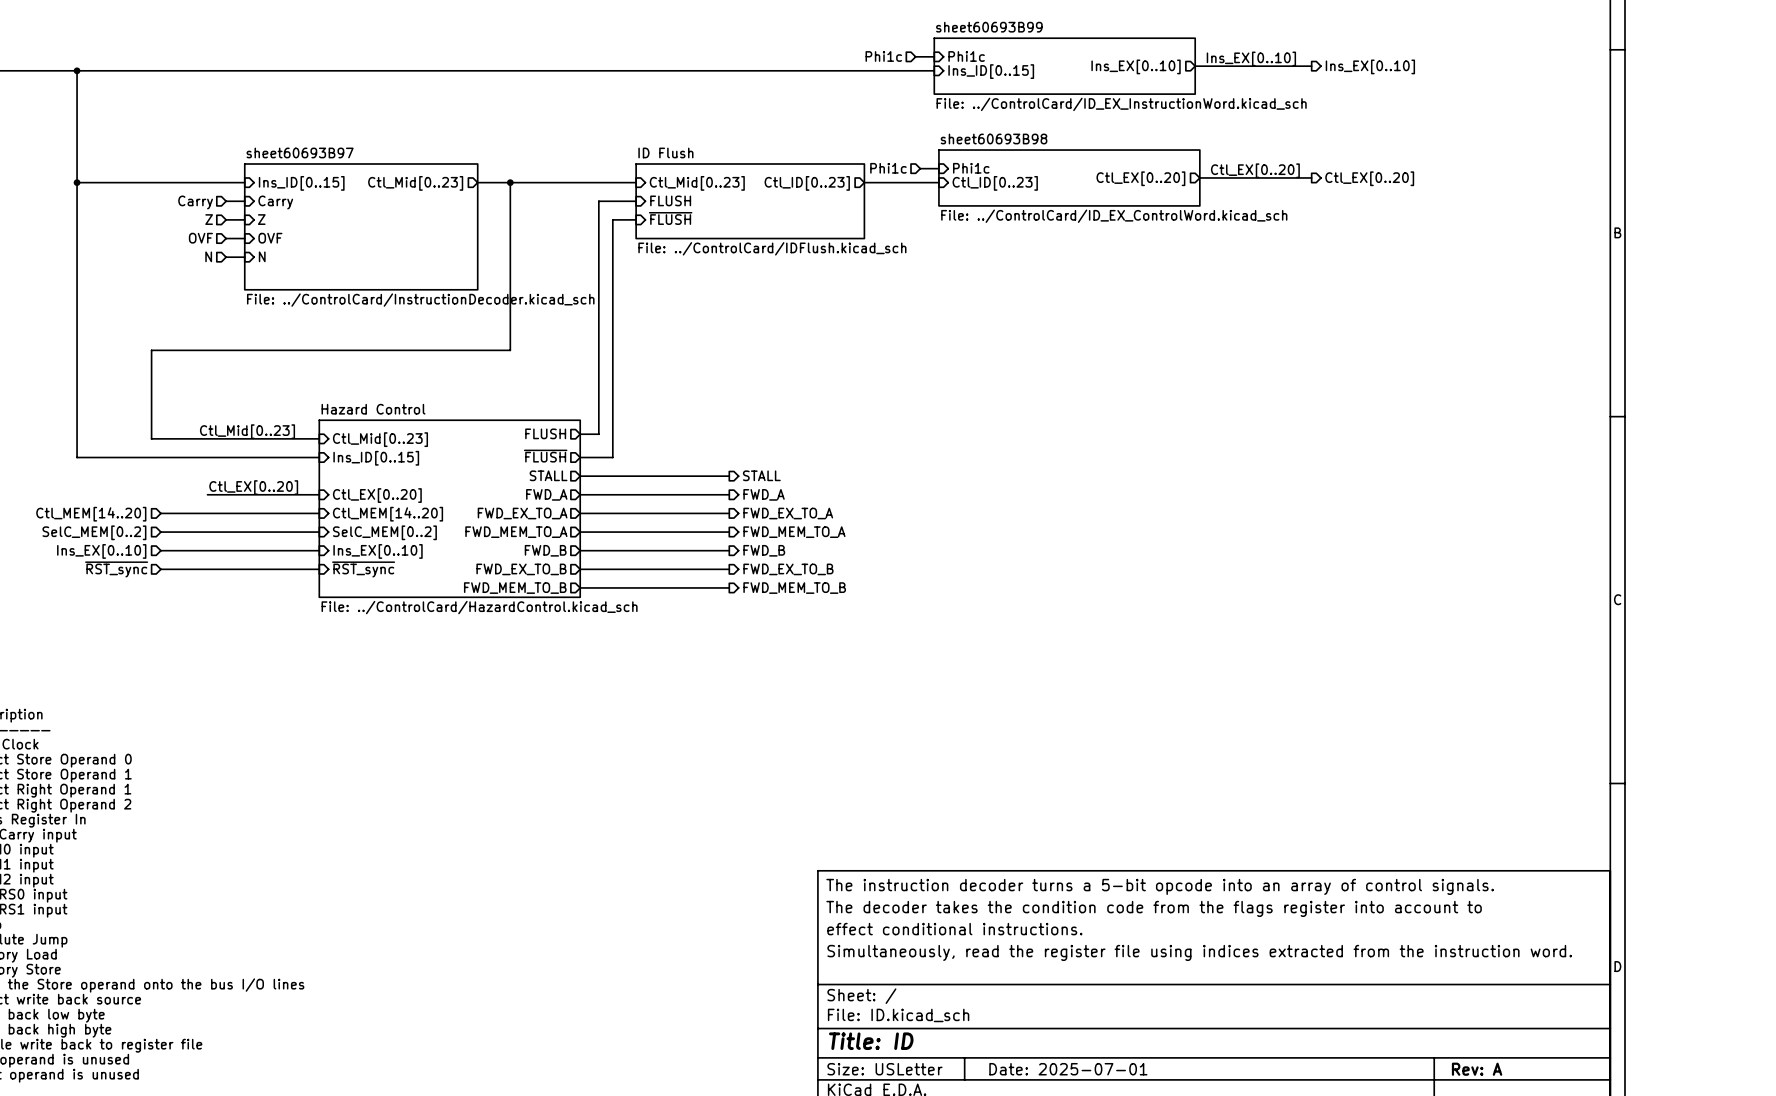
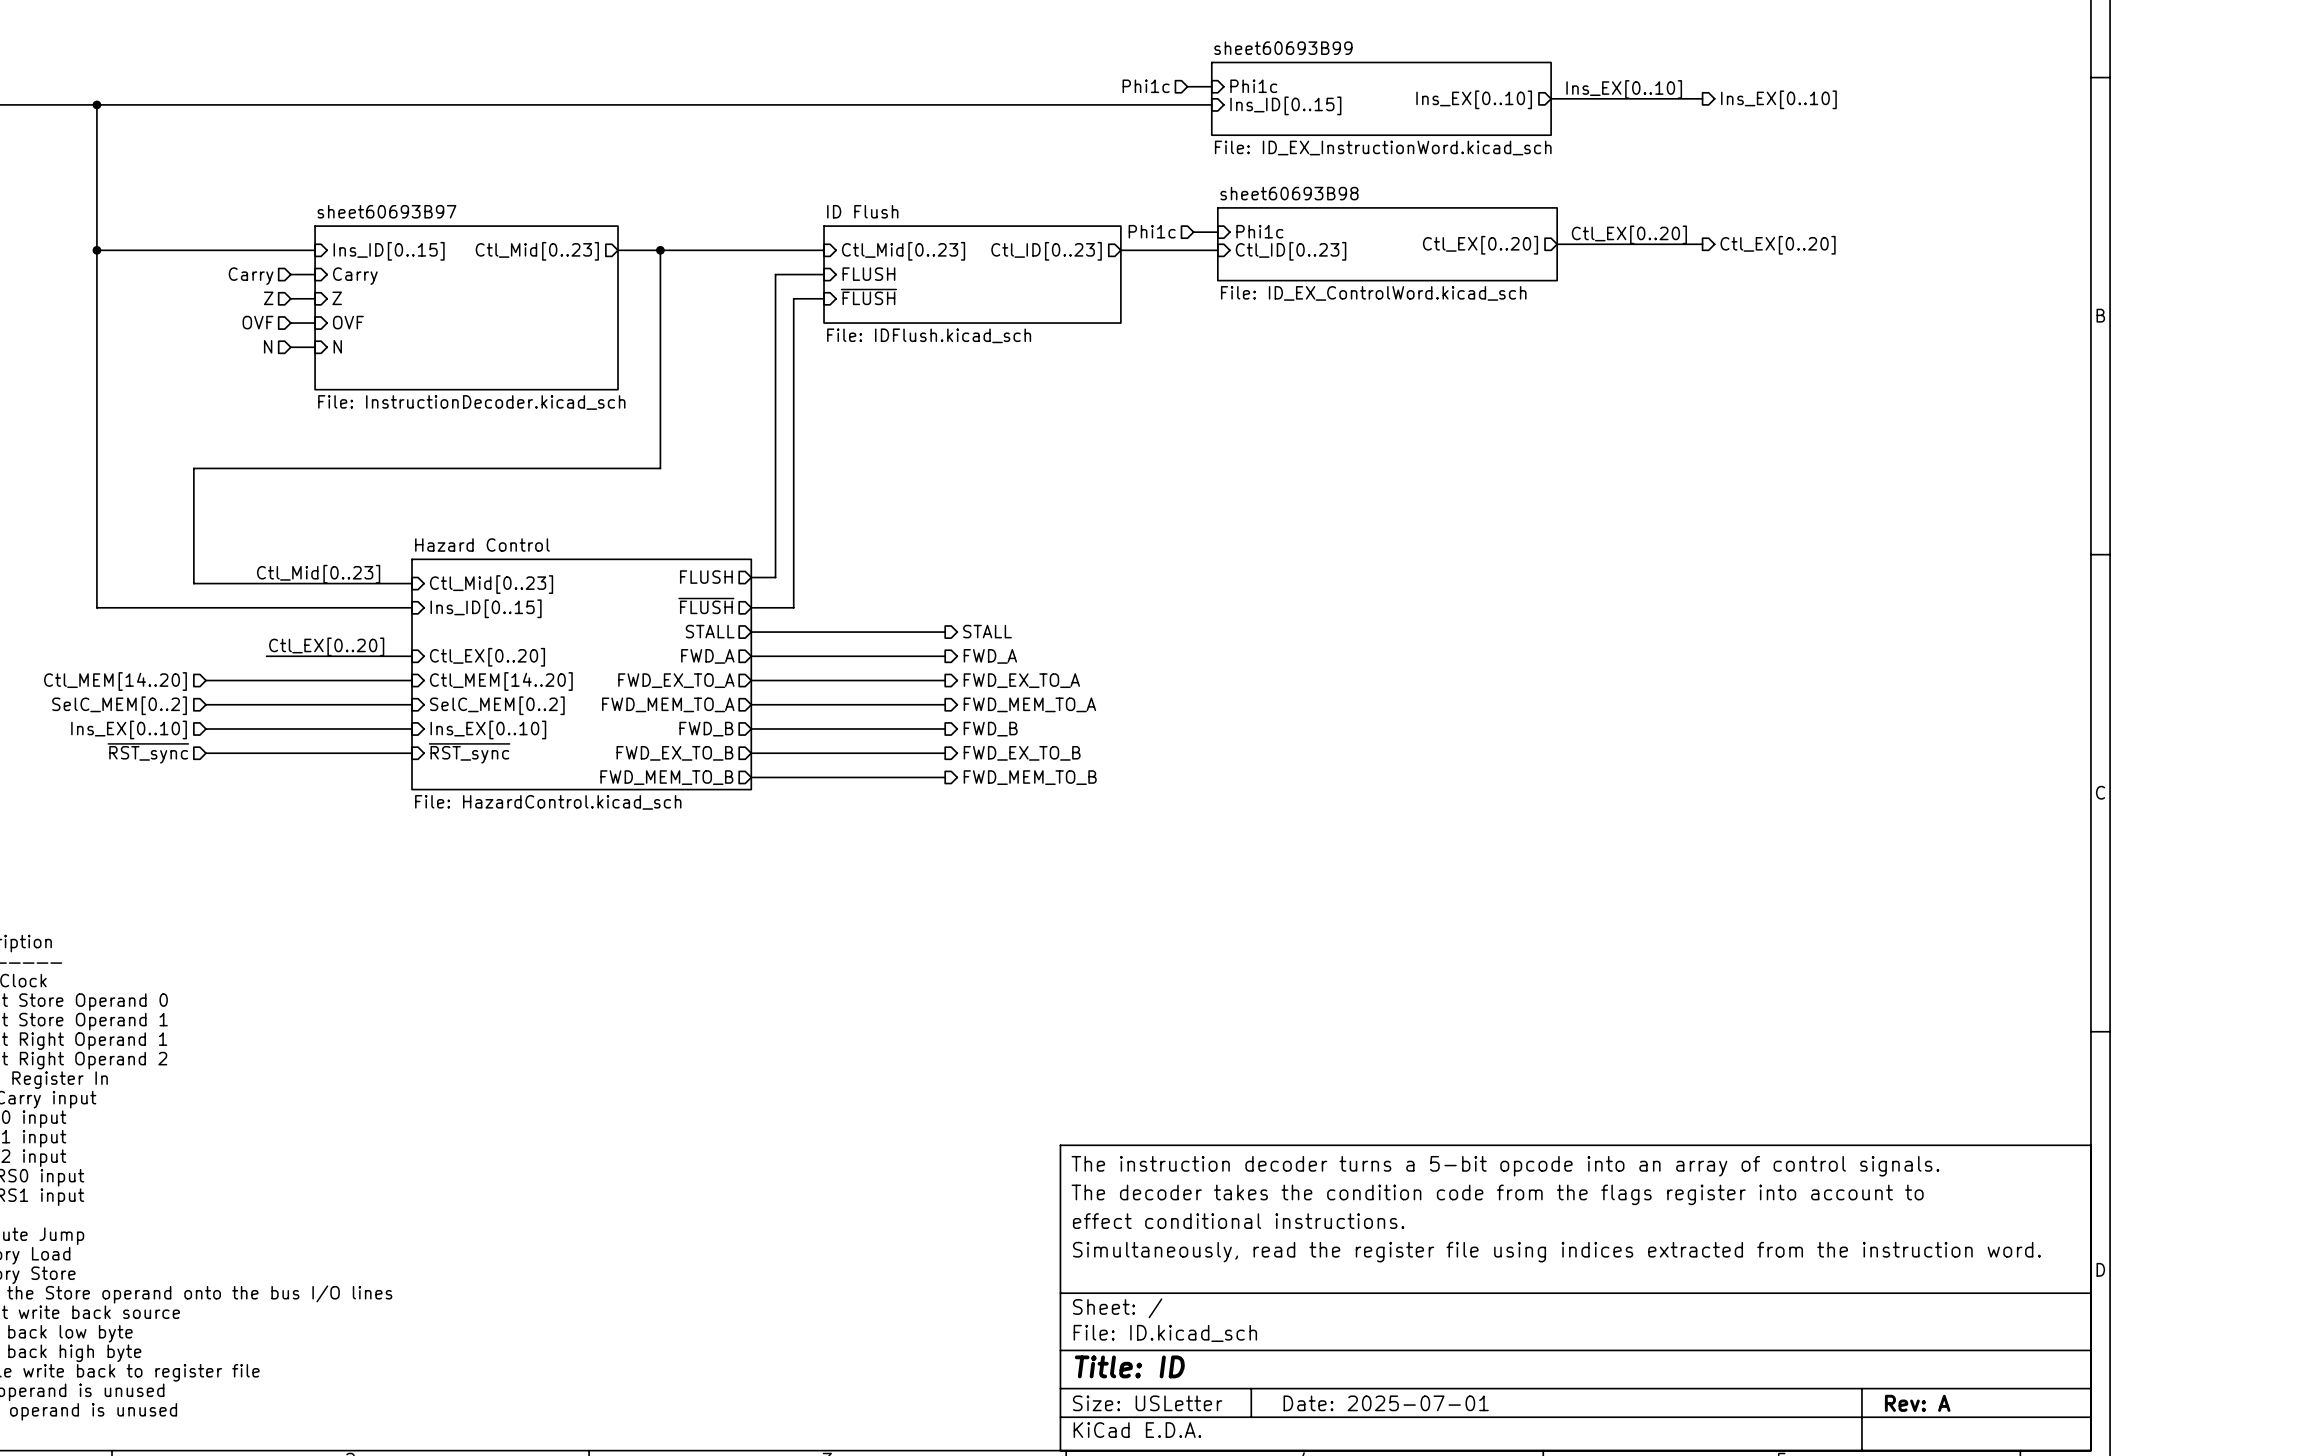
sheet sheet60693B99 value: File: ../ControlCard/ID_EX_InstructionWord.kicad_sch (1121, 104) -> File: ID_EX_InstructionWord.kicad_sch (1383, 147)
sheet sheet60693B98 value: File: ../ControlCard/ID_EX_ControlWord.kicad_sch (1114, 216) -> File: ID_EX_ControlWord.kicad_sch (1373, 293)
sheet ID Flush value: File: ../ControlCard/IDFlush.kicad_sch (772, 248) -> File: IDFlush.kicad_sch (929, 335)
sheet sheet60693B97 value: File: ../ControlCard/InstructionDecoder.kicad_sch (420, 300) -> File: InstructionDecoder.kicad_sch (471, 402)
sheet Hazard Control value: File: ../ControlCard/HazardControl.kicad_sch (479, 607) -> File: HazardControl.kicad_sch (548, 802)

